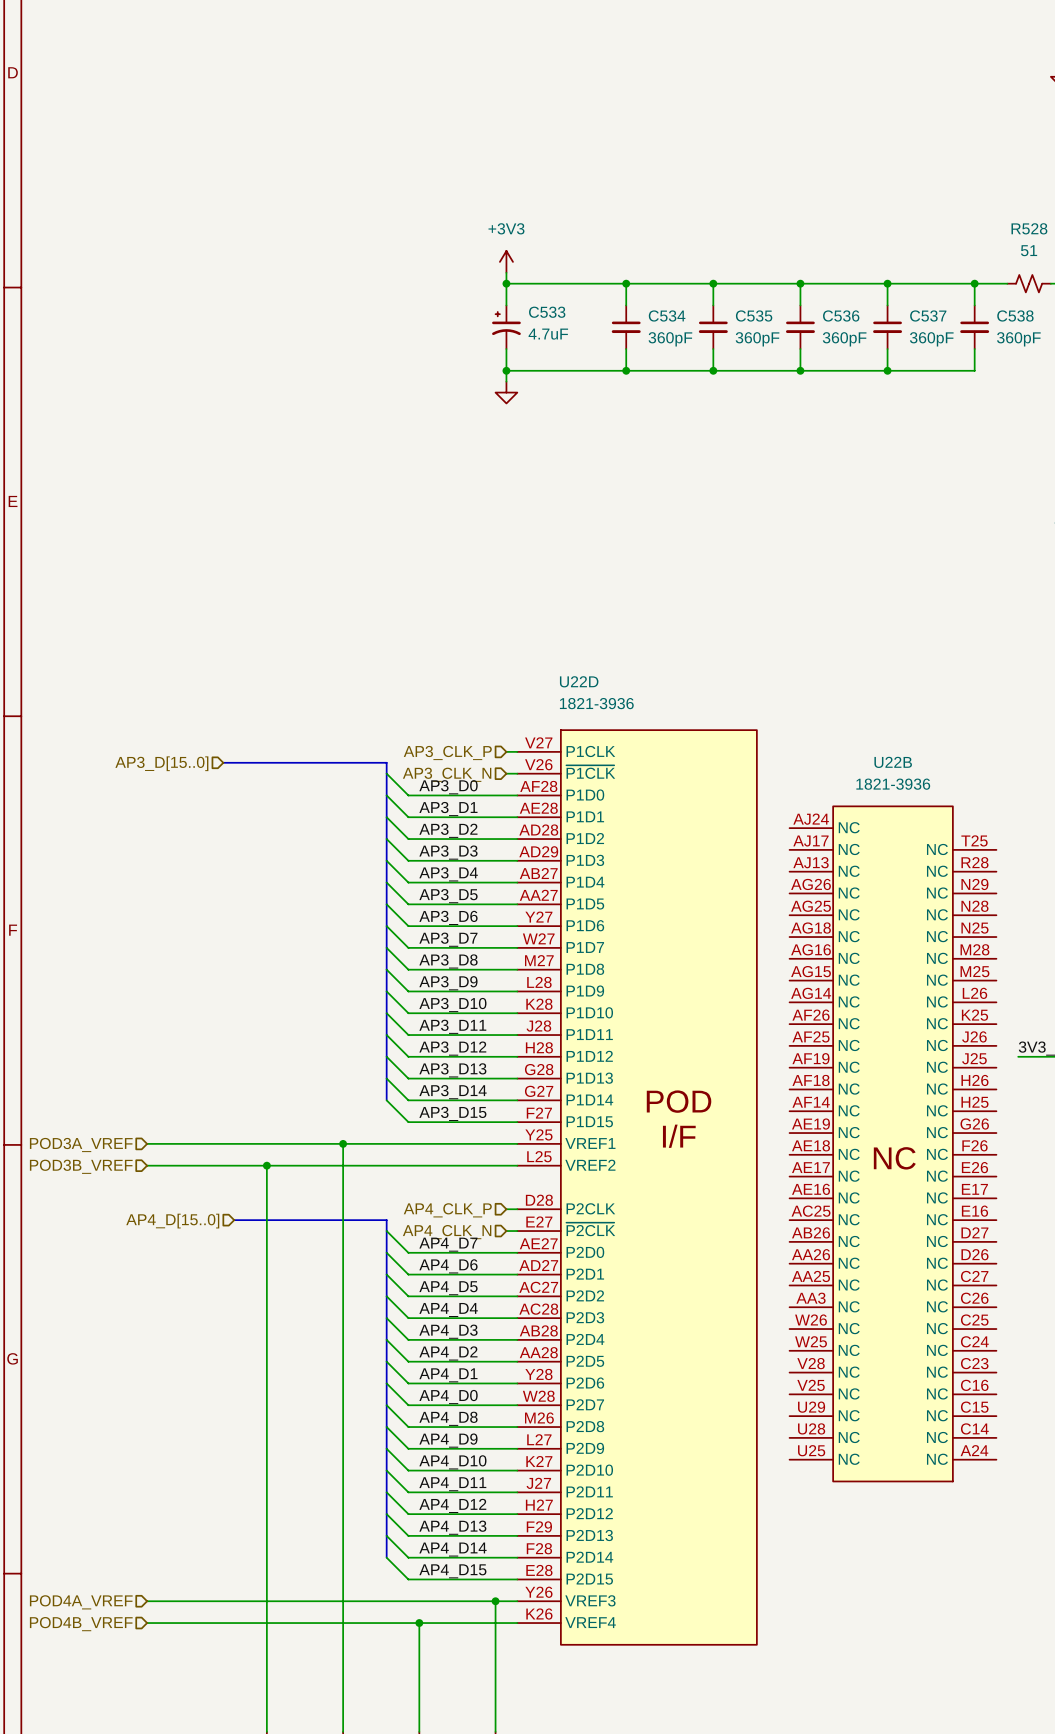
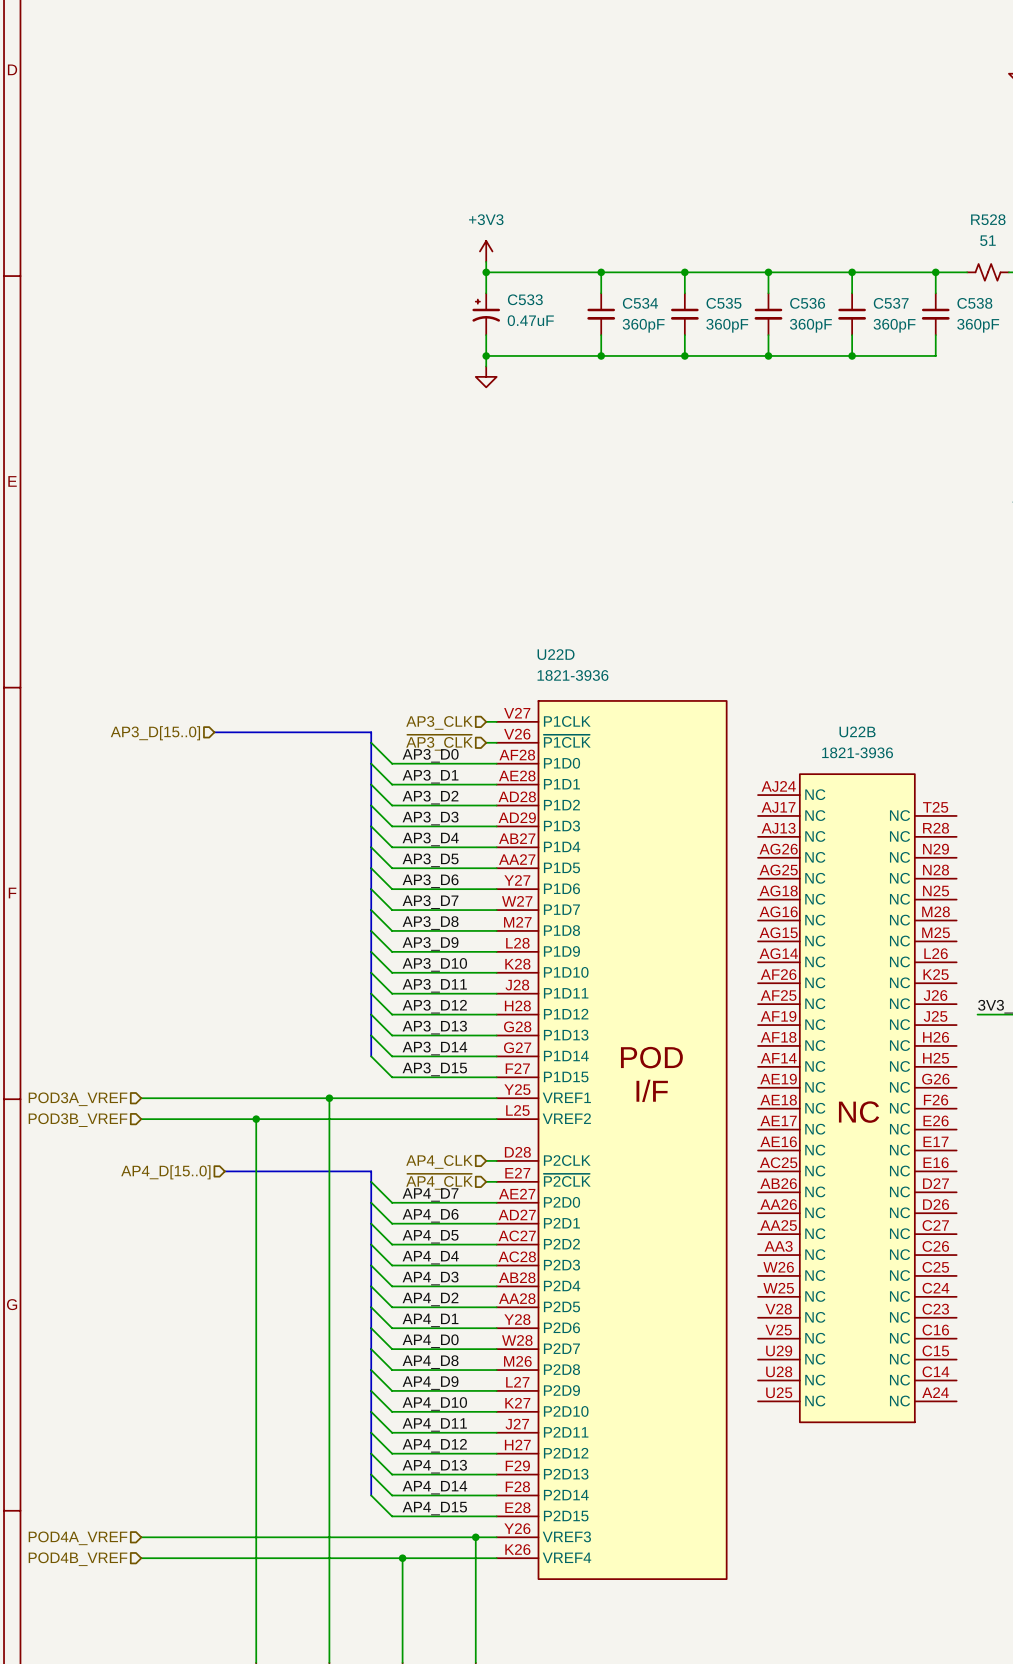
C533 value: 4.7uF (548, 334) -> 0.47uF (530, 320)
hierarchical label: AP3_CLK_P (447, 752) -> AP3_CLK (439, 722)
hierarchical label: AP3_CLK_N (447, 774) -> ~{AP3_CLK} (439, 742)
hierarchical label: AP4_CLK_P (447, 1210) -> AP4_CLK (439, 1161)
hierarchical label: AP4_CLK_N (447, 1232) -> ~{AP4_CLK} (439, 1181)

